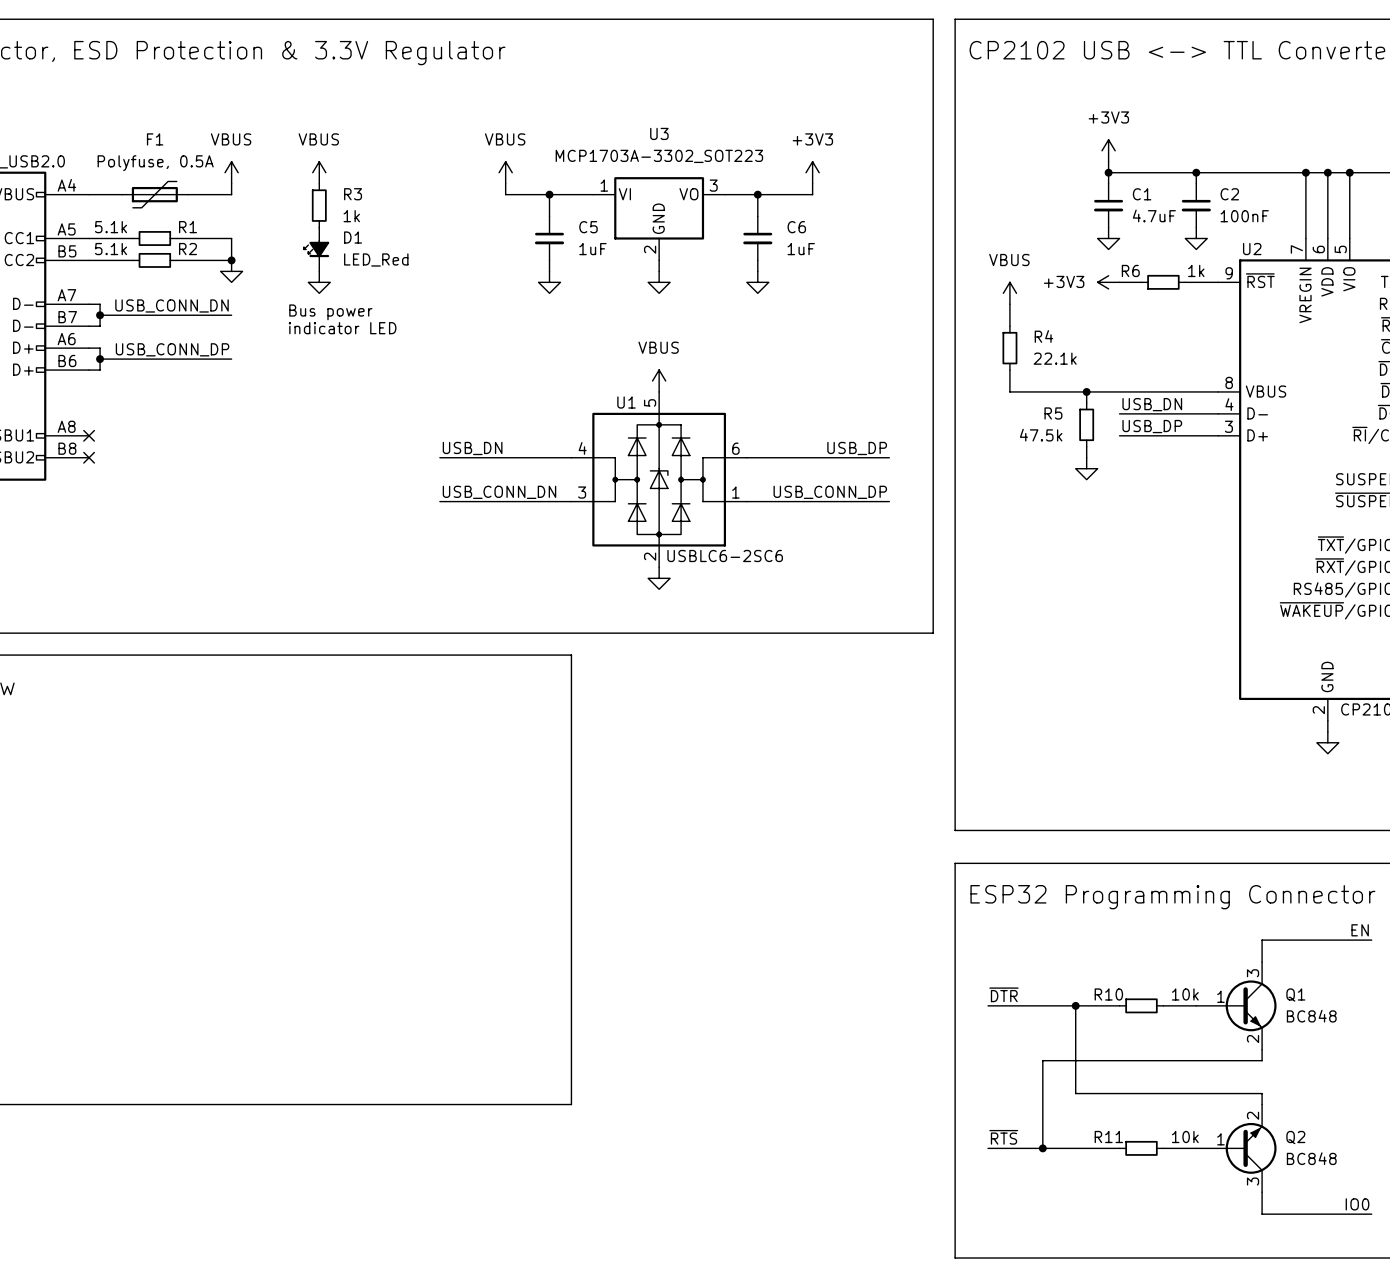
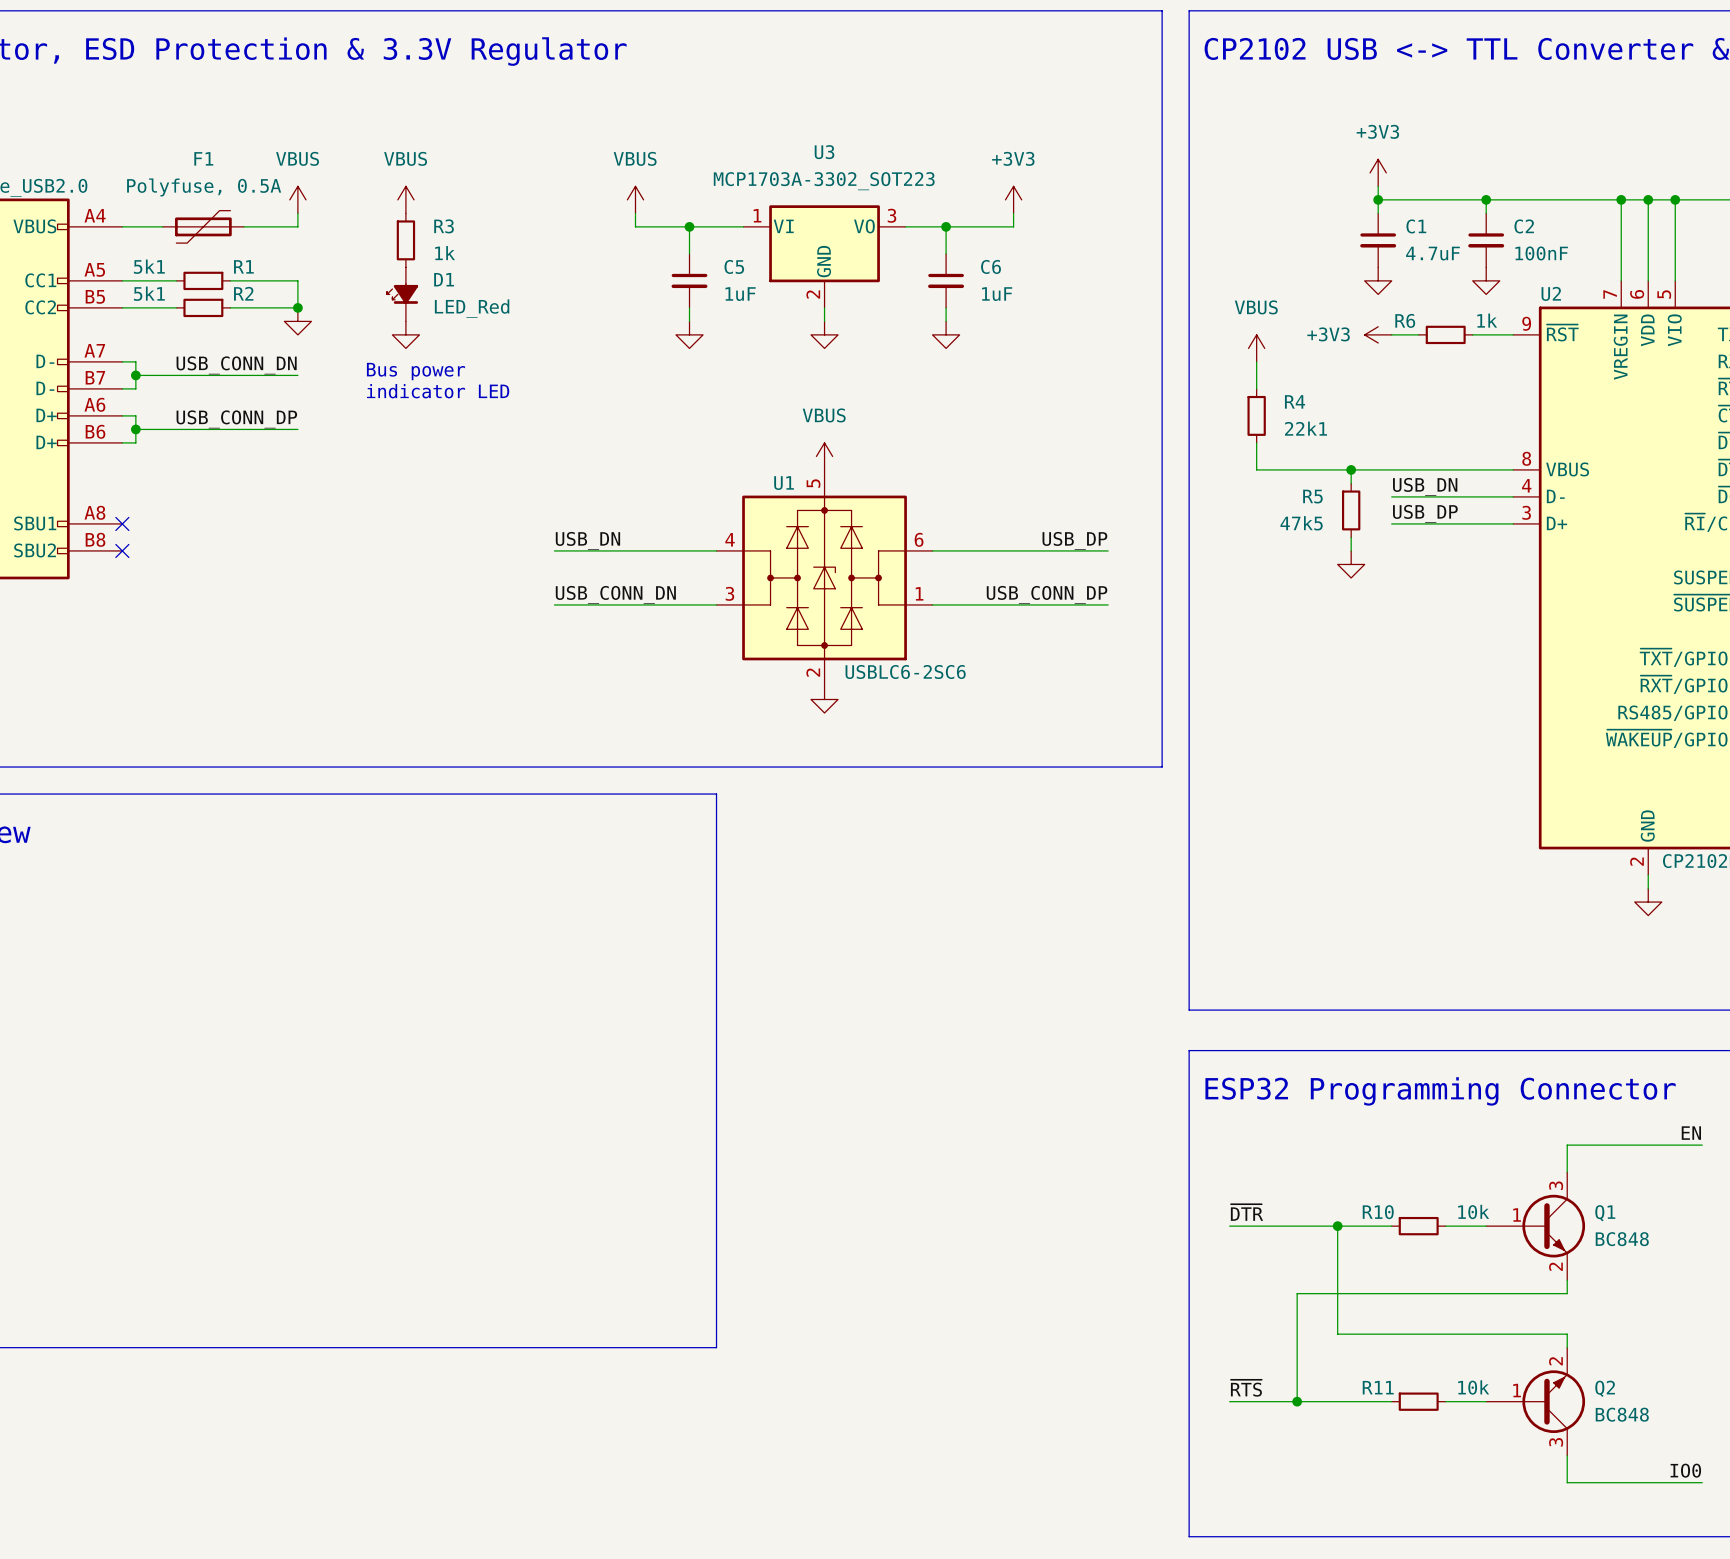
R1 value: 5.1k (111, 227) -> 5k1 (149, 266)
R2 value: 5.1k (111, 249) -> 5k1 (149, 293)
R4 value: 22.1k (1055, 358) -> 22k1 (1306, 428)
R5 value: 47.5k (1041, 435) -> 47k5 (1301, 523)

